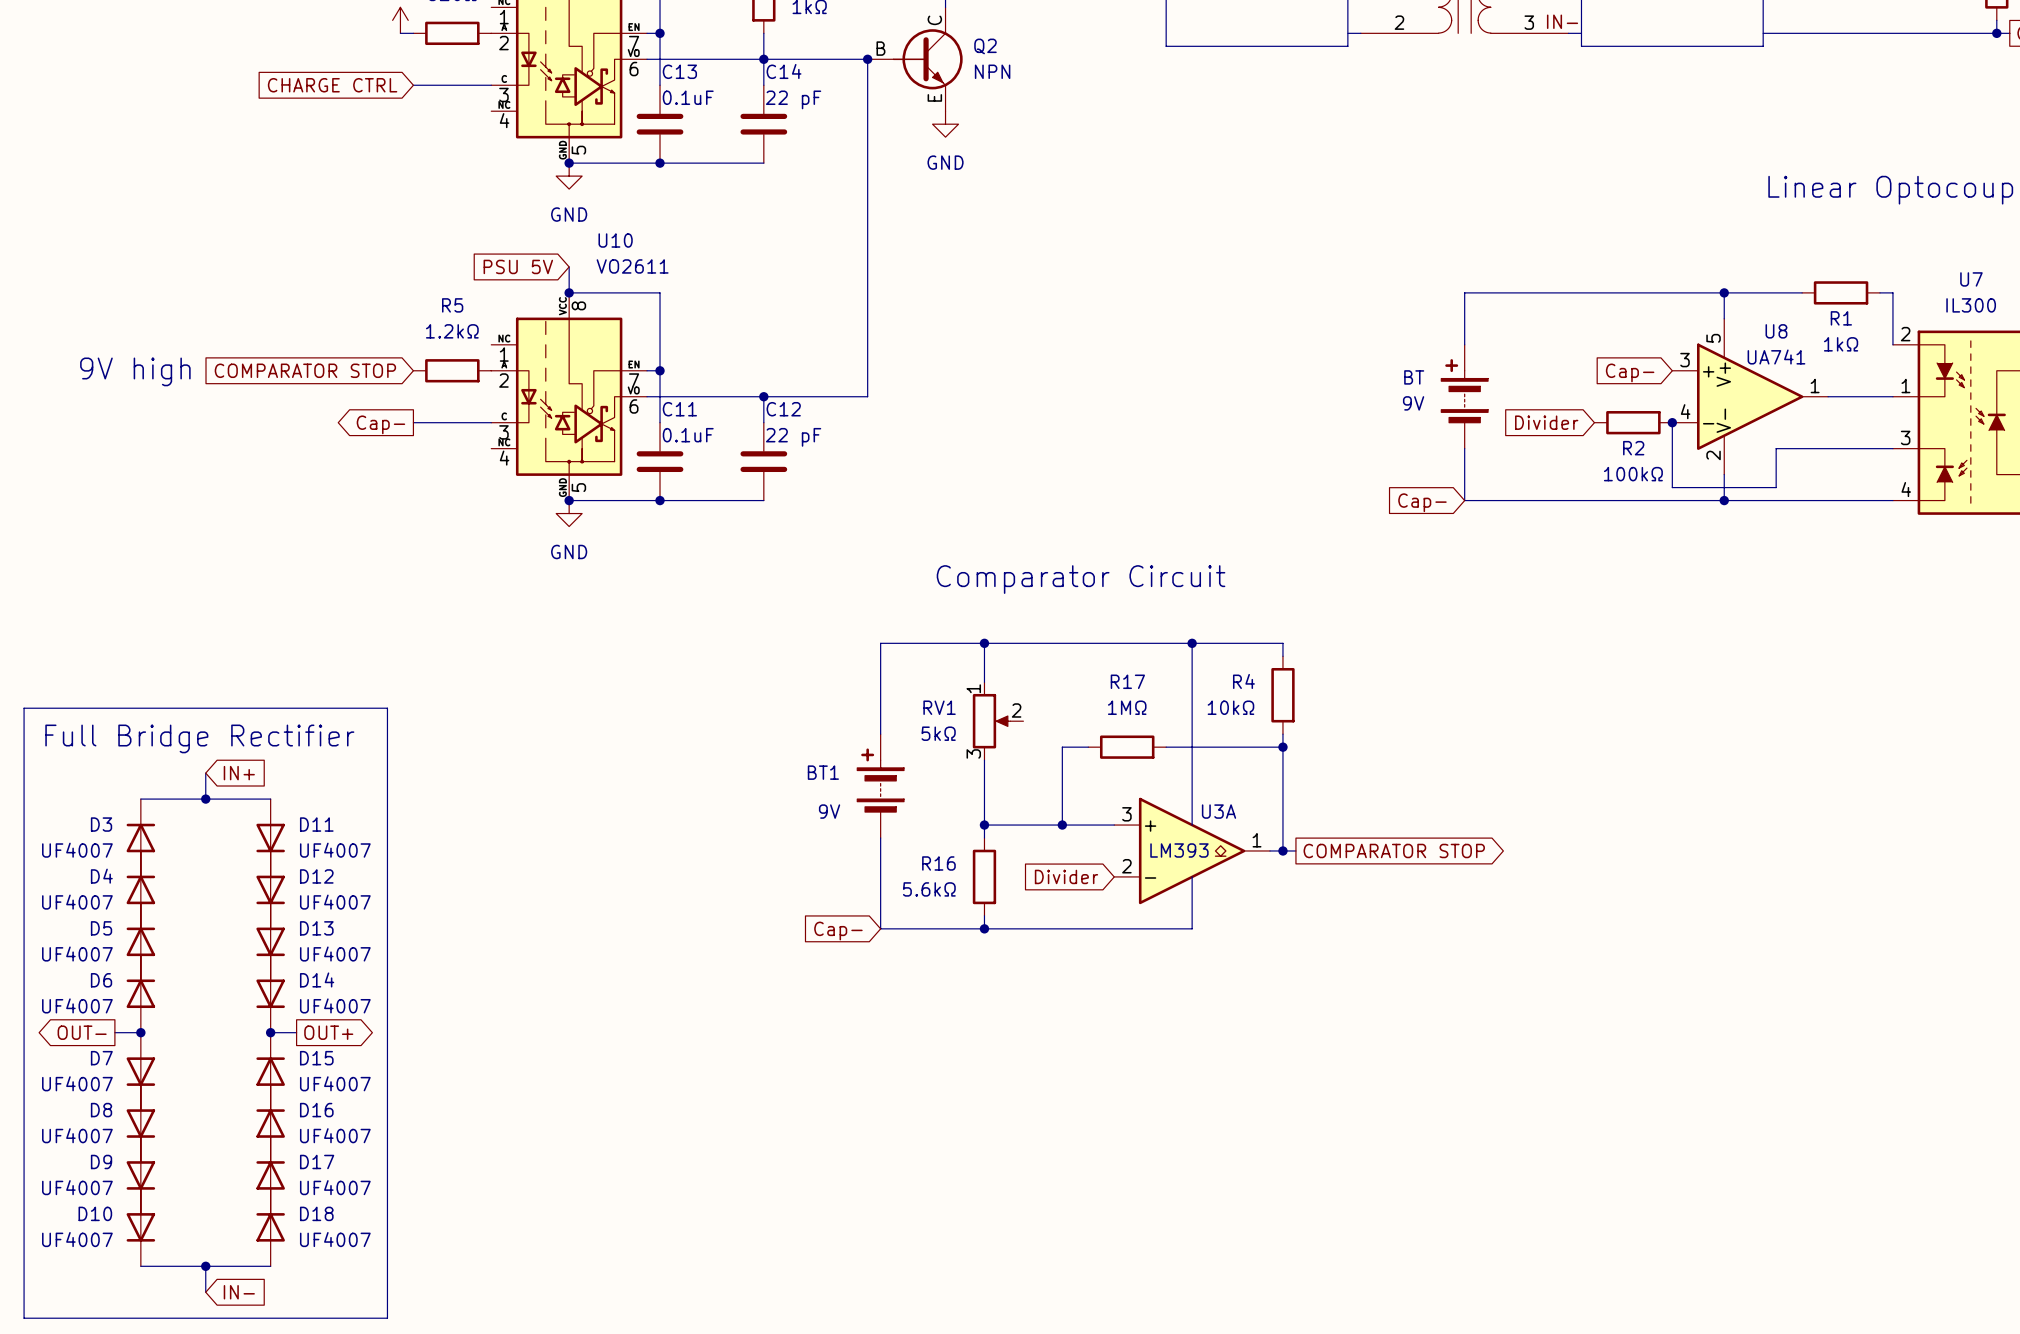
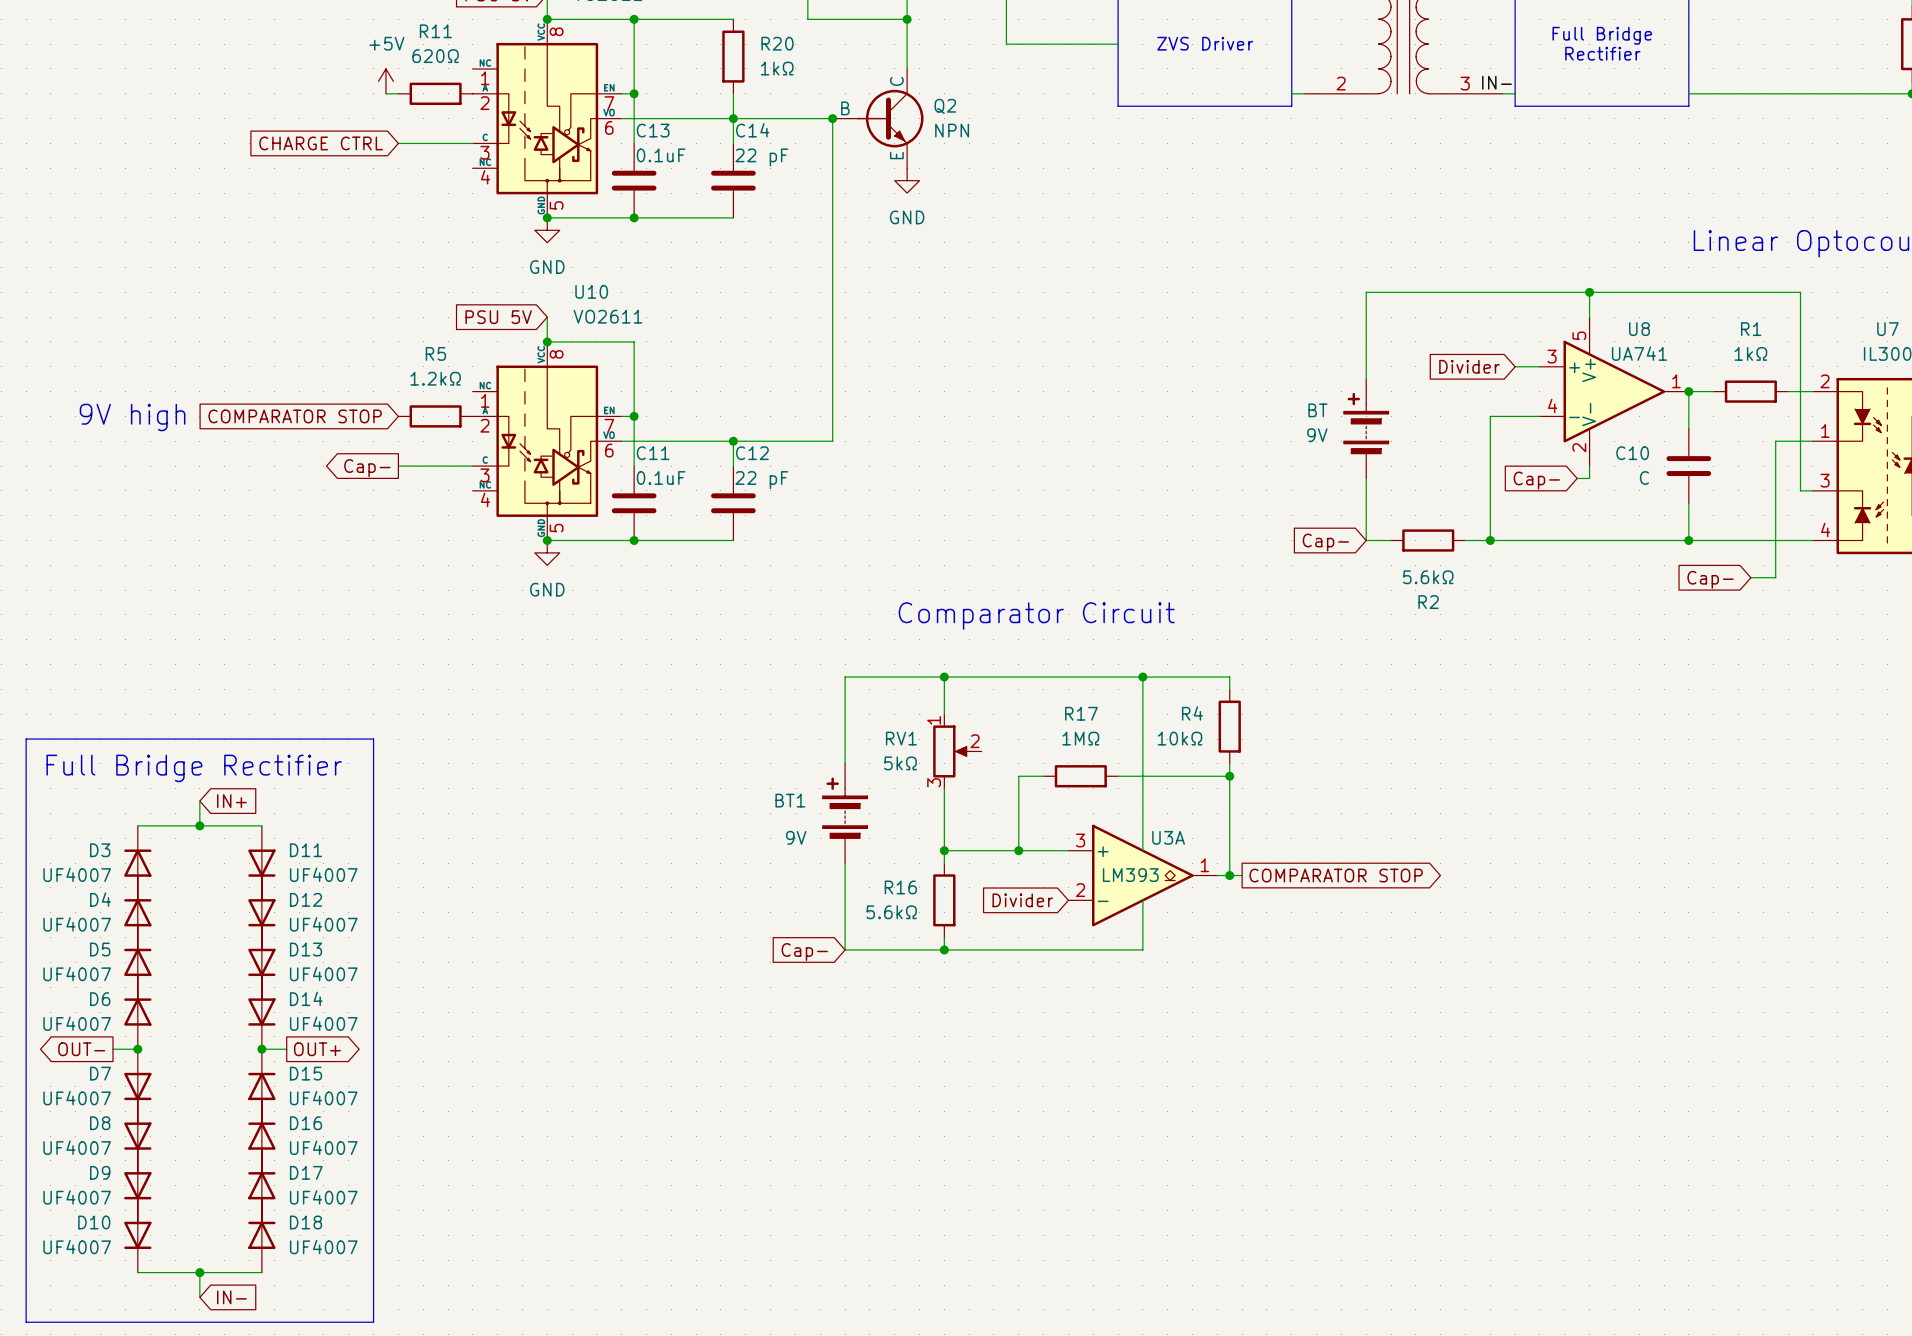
junction: none -> (1589, 292)
wire: (1724, 292) (1724, 318) -> (1589, 292) (1589, 317)
junction: (1724, 292) -> none
wire: (1802, 292) (1464, 292) (1464, 344) -> none
R1 position: (1841, 292) -> (1750, 391)
wire: (1879, 292) (1892, 292) (1892, 344) -> (1788, 391) (1812, 391)
wire: none -> (1515, 366) (1539, 366)
R1 name position: R1 (1841, 318) -> R1 (1751, 329)
junction: none -> (1688, 391)
wire: none -> (1713, 391) (1688, 391) (1688, 428)
R1 value position: 1kΩ (1841, 344) -> 1kΩ (1750, 353)
wire: none -> (1539, 416) (1490, 416) (1490, 540)
global label position: Cap- (1630, 372) -> Cap- (1536, 480)
BT position: (1464, 396) -> (1366, 428)
U8 position: (1750, 396) -> (1614, 391)
wire: (1828, 396) (1854, 396) -> (1750, 577) (1775, 577) (1775, 441)
global label position: Divider (1546, 422) -> Divider (1469, 366)
R2 position: (1633, 422) -> (1428, 540)
wire: none -> (1589, 466) (1589, 478) (1577, 478)
wire: (1672, 422) (1672, 487) (1776, 487) (1776, 448) (1879, 448) -> (1366, 379) (1366, 292) (1800, 292) (1800, 490)
junction: (1672, 422) -> none
C10: none -> C (1688, 466)
wire: none -> (1366, 478) (1366, 540) (1391, 540)
wire: (1464, 448) (1464, 500) (1529, 500) -> none
R2 name position: R2 (1633, 448) -> R2 (1428, 602)
wire: none -> (1688, 503) (1688, 540)
R2 value: 100kΩ (1633, 474) -> 5.6kΩ (1428, 577)
wire: (1724, 474) (1724, 500) -> none
junction: none -> (1490, 540)
junction position: (1724, 500) -> (1688, 540)
global label position: Cap- (1422, 502) -> Cap- (1325, 542)
global label: none -> Cap- (1710, 579)

